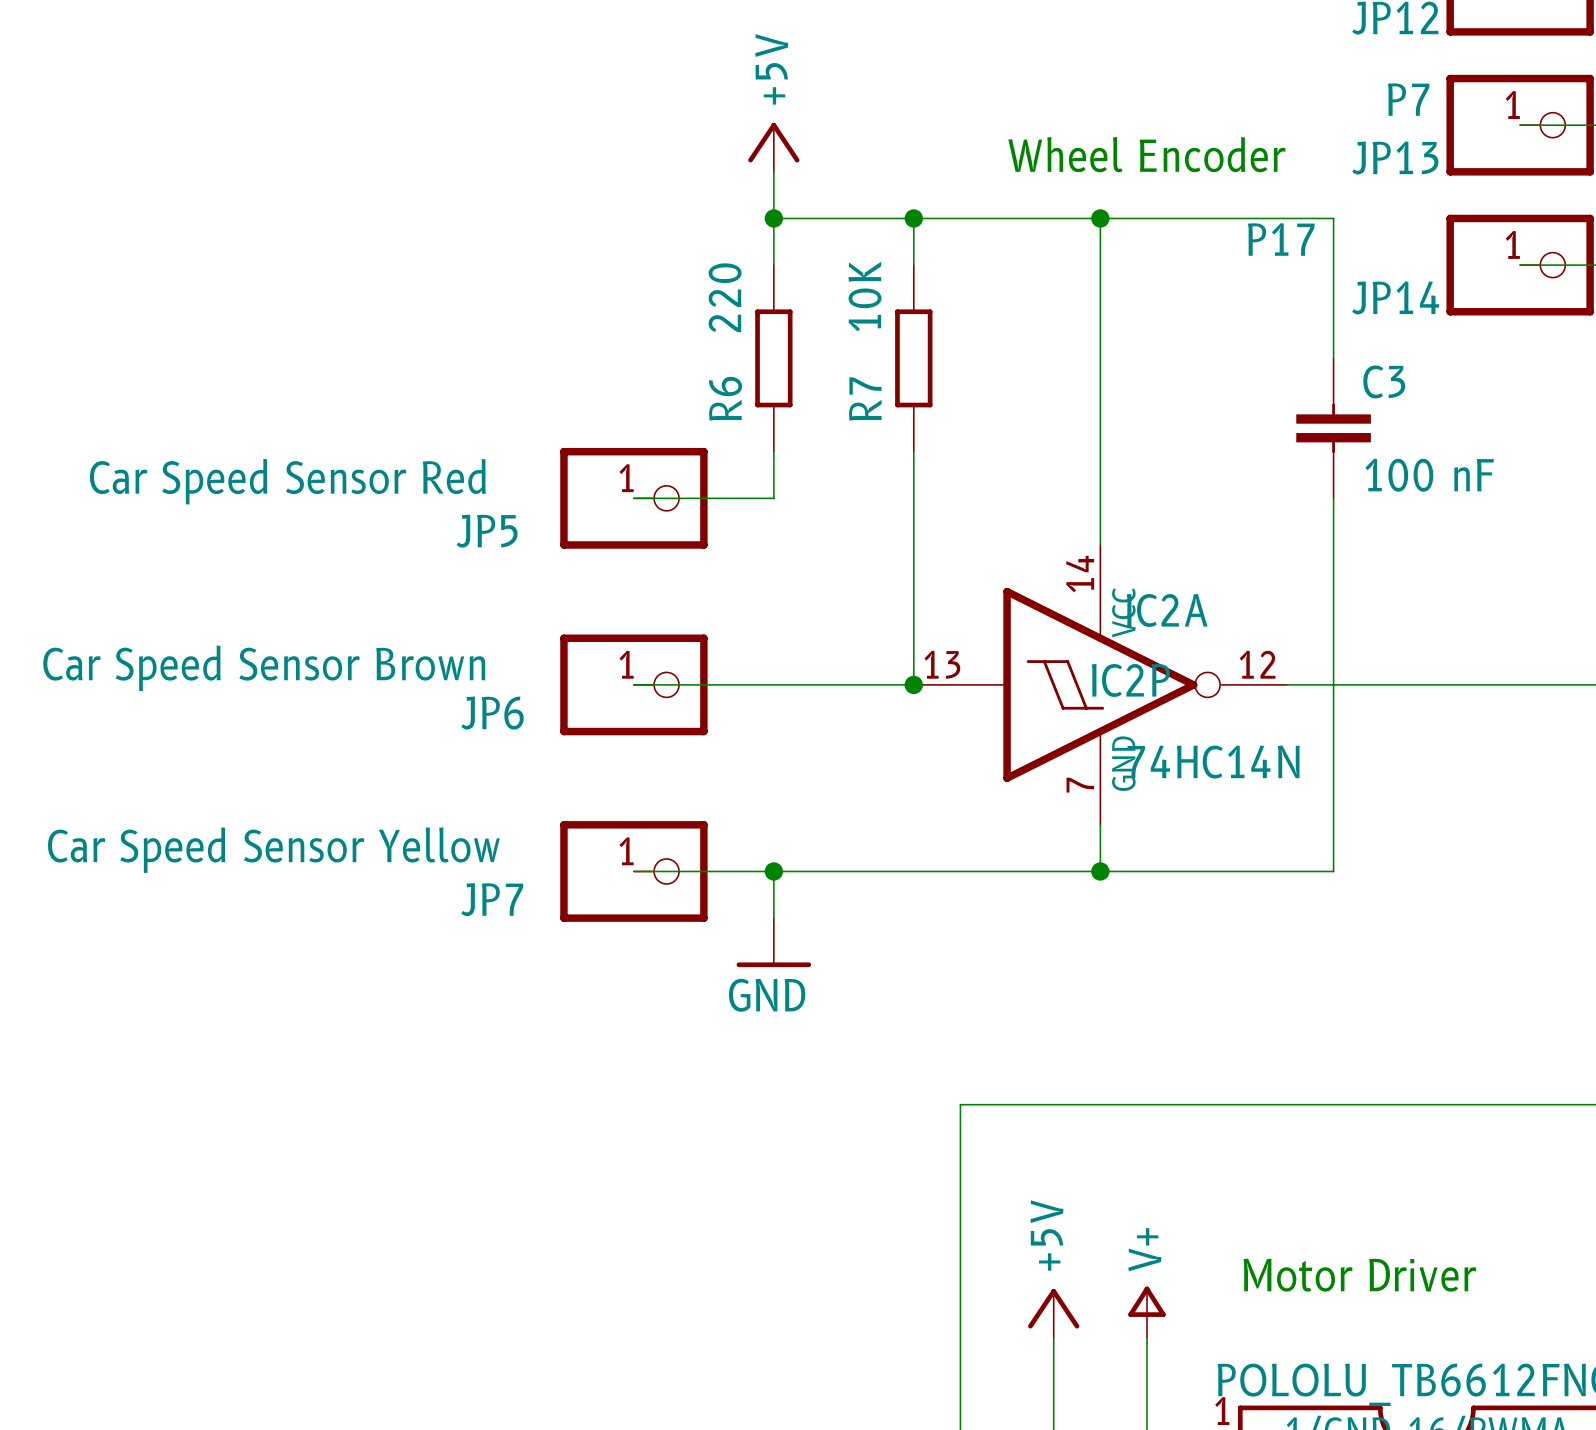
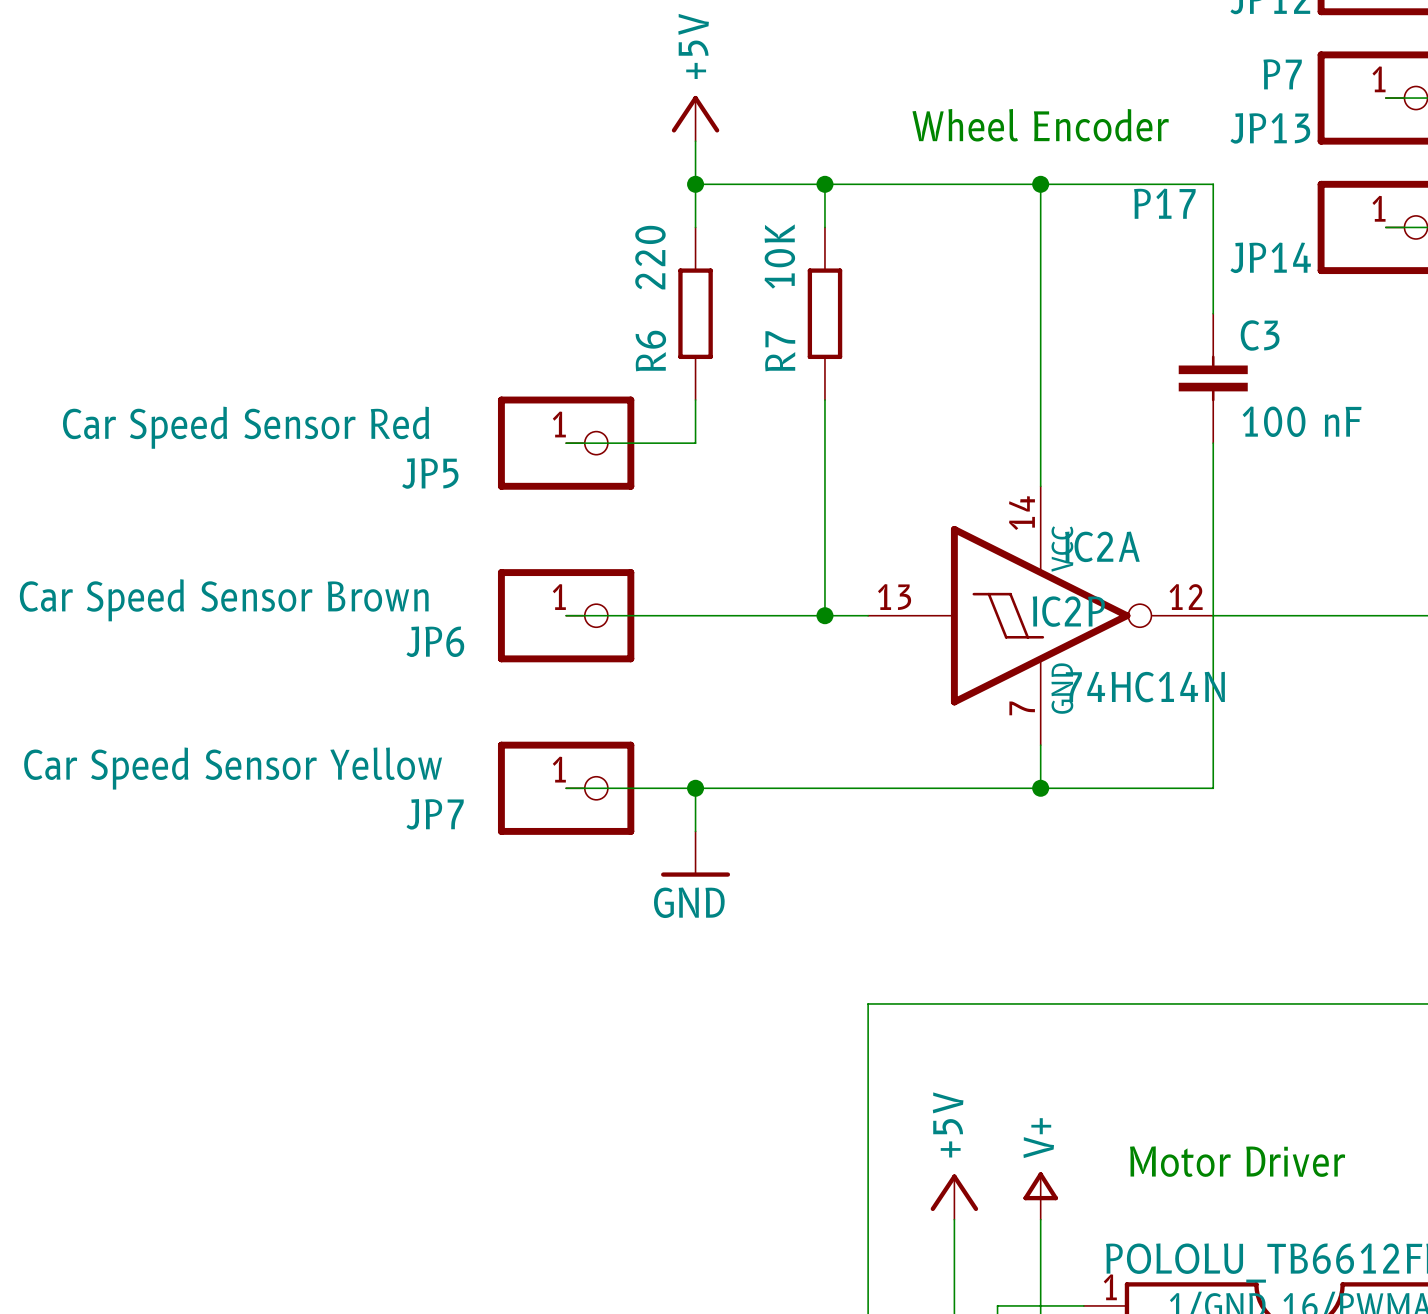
wire: (1100, 218) (1100, 544) -> (1040, 184) (1040, 486)
junction position: (1100, 218) -> (1040, 184)
IC2A position: (1100, 684) -> (1040, 615)
IC2P position: (1100, 684) -> (1040, 615)
wire: (1100, 824) (1100, 871) -> (1040, 745) (1040, 788)
junction position: (1100, 871) -> (1040, 788)

